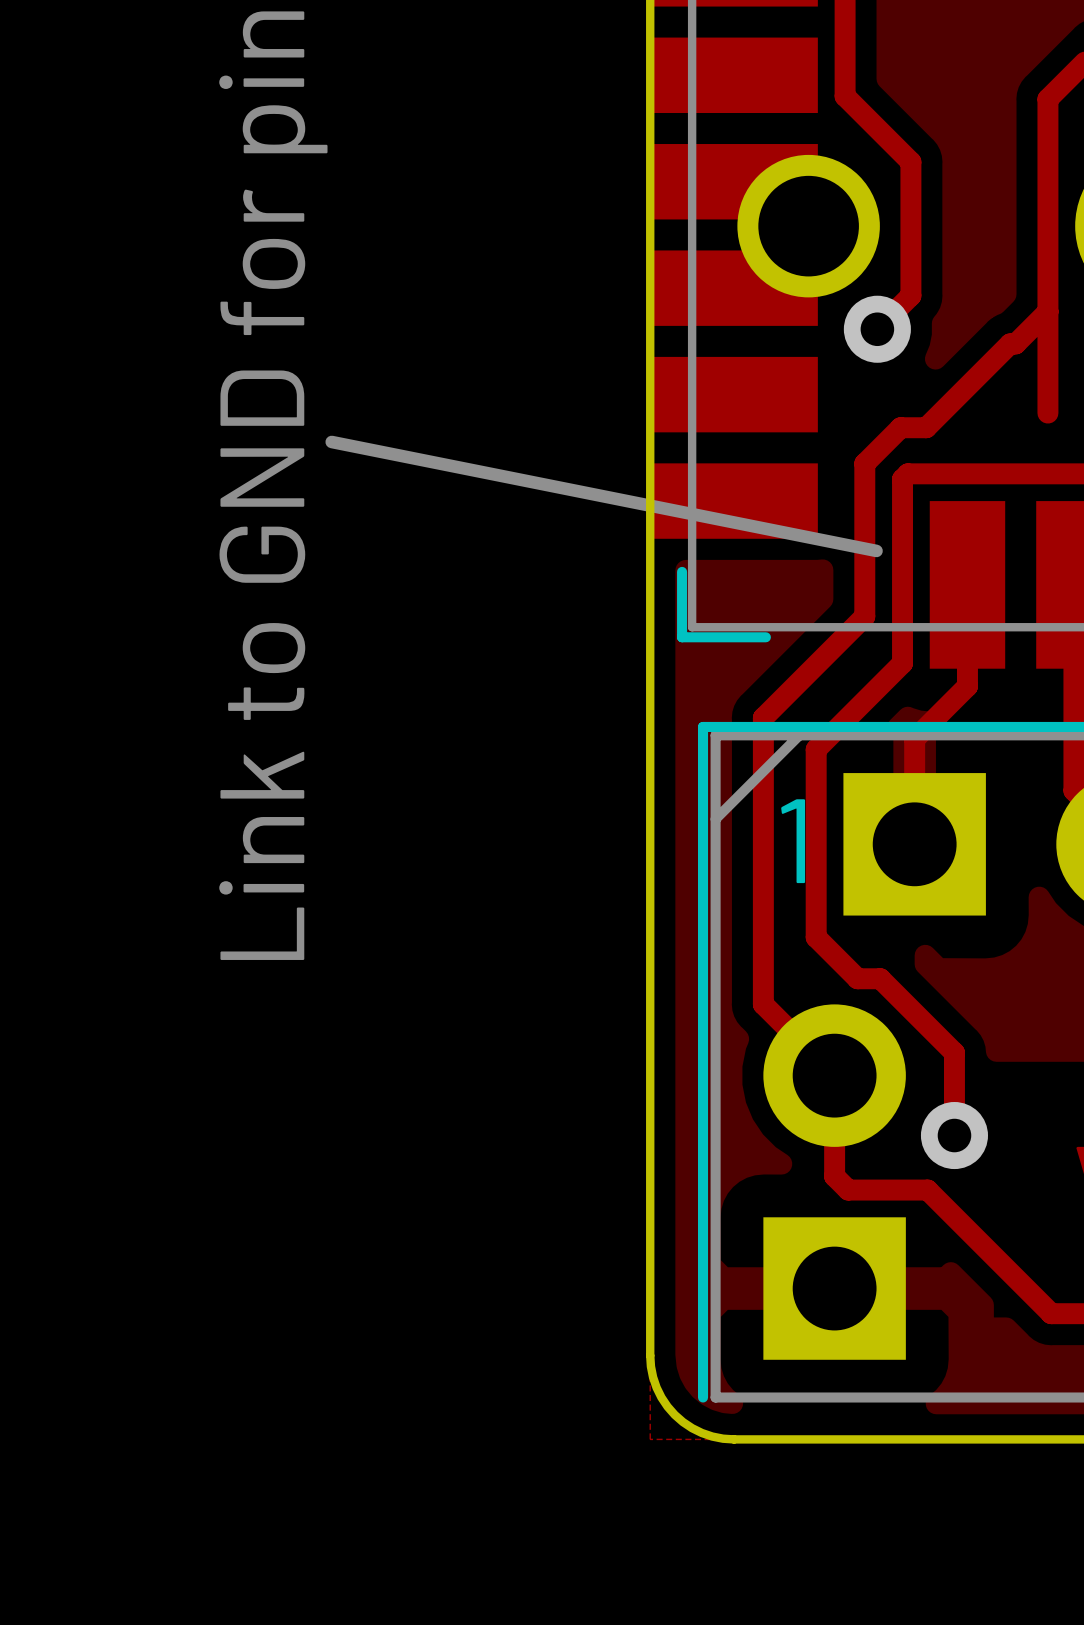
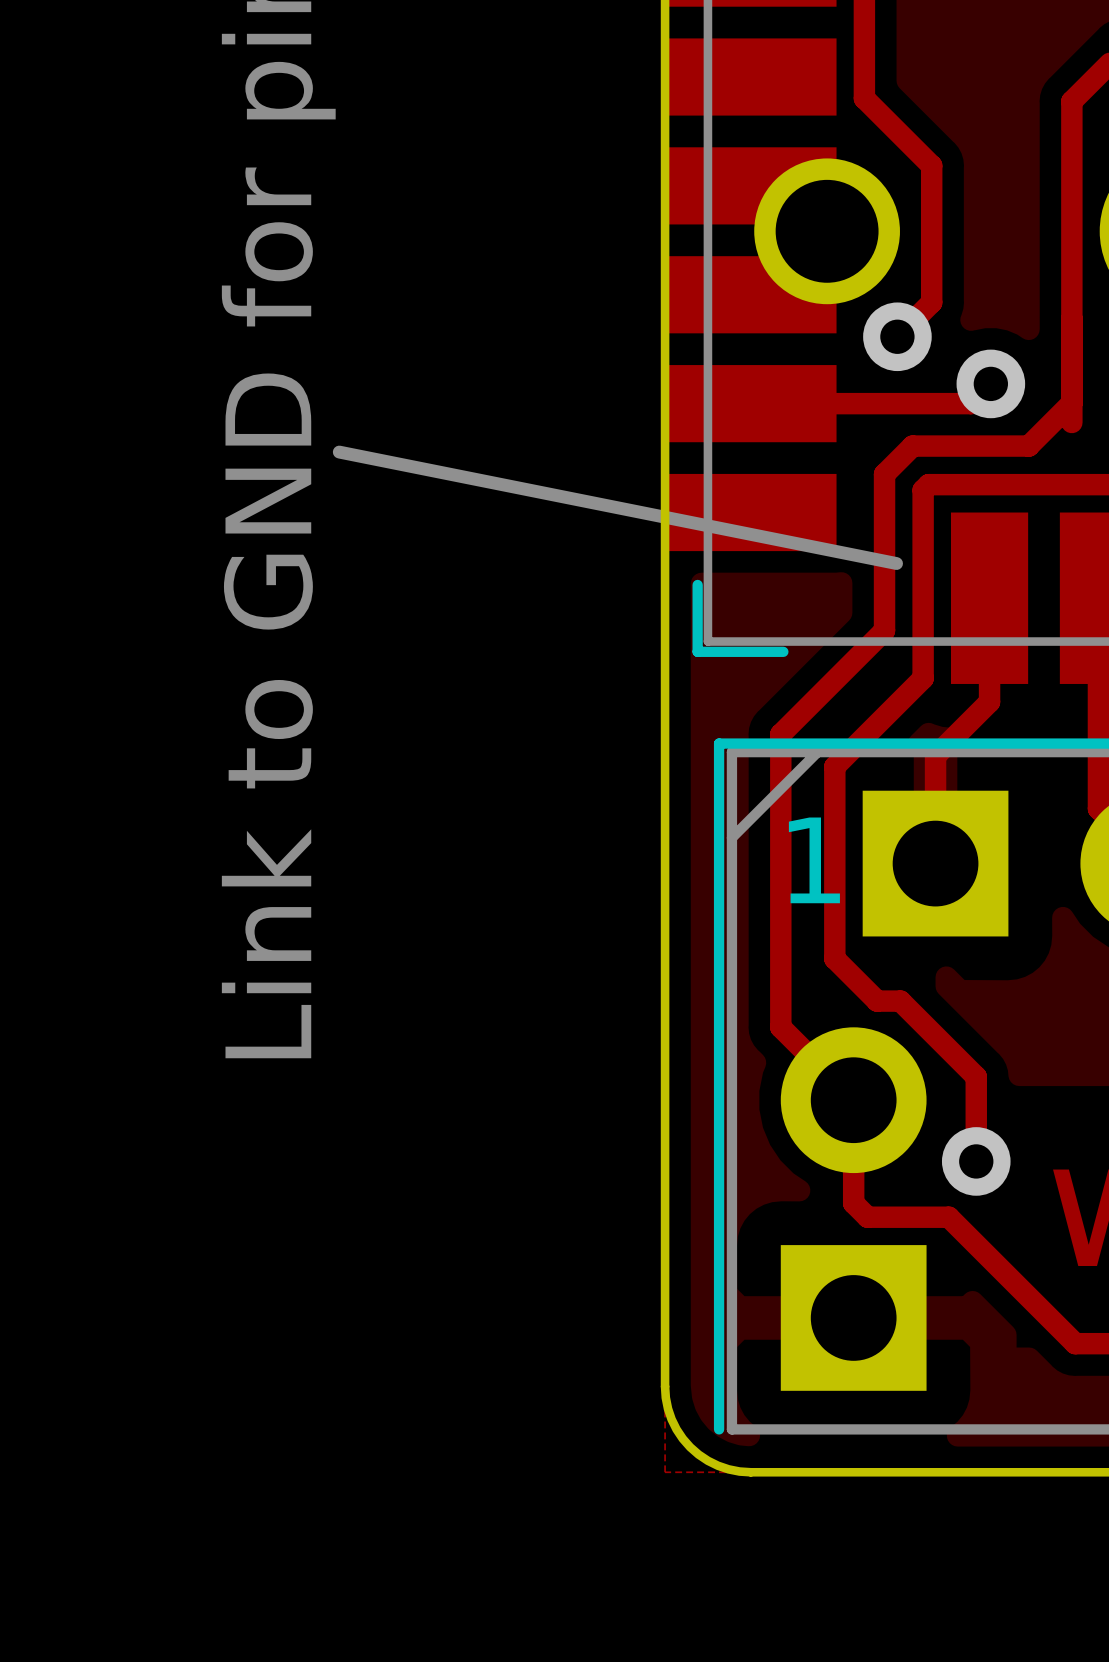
track: (1047, 311) (1015, 343) (1010, 343) (926, 427) (900, 427) (892, 436) -> (1071, 403) (1028, 446) (912, 446)
track: none -> (990, 383) (971, 403) (750, 403)
via: none -> (990, 383)

